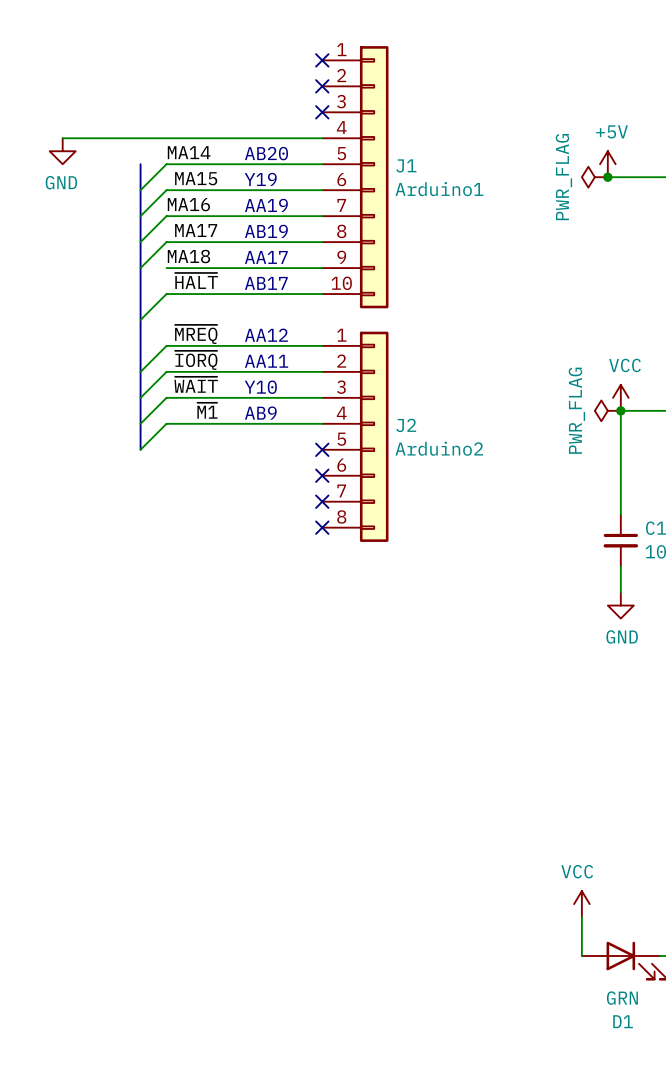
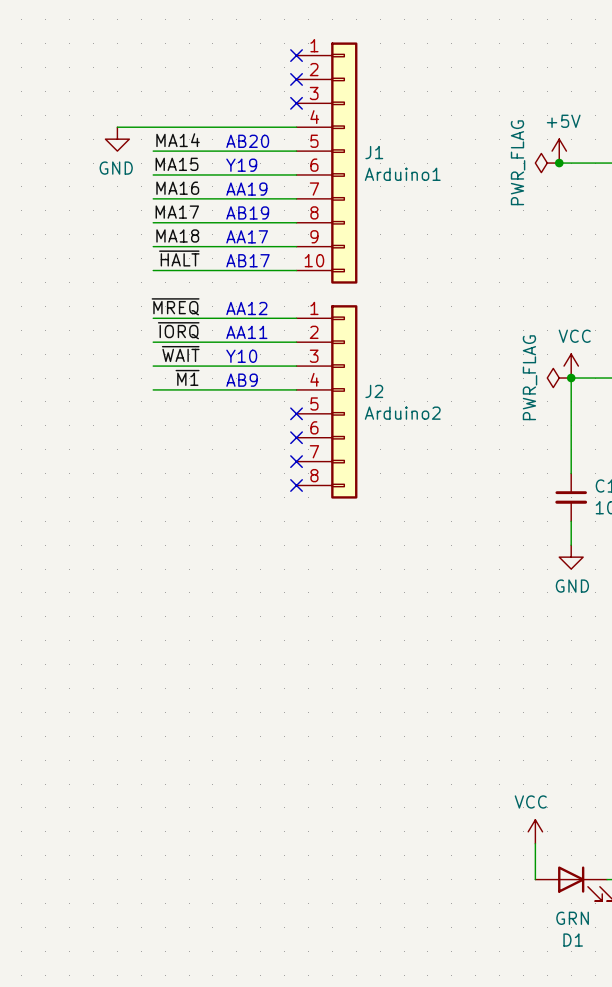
wire: (62, 138) (127, 138) -> none
power symbol position: GND (62, 151) -> GND (117, 139)
bus: (140, 164) (140, 449) -> none
wire: (166, 164) (140, 190) -> none
wire: (166, 190) (140, 216) -> none
wire: (166, 216) (140, 242) -> none
wire: (166, 242) (140, 268) -> none
wire: (166, 294) (140, 319) -> none
wire: (166, 345) (140, 371) -> none
wire: (166, 371) (140, 397) -> none
wire: (166, 397) (140, 423) -> none
wire: (166, 423) (140, 449) -> none

